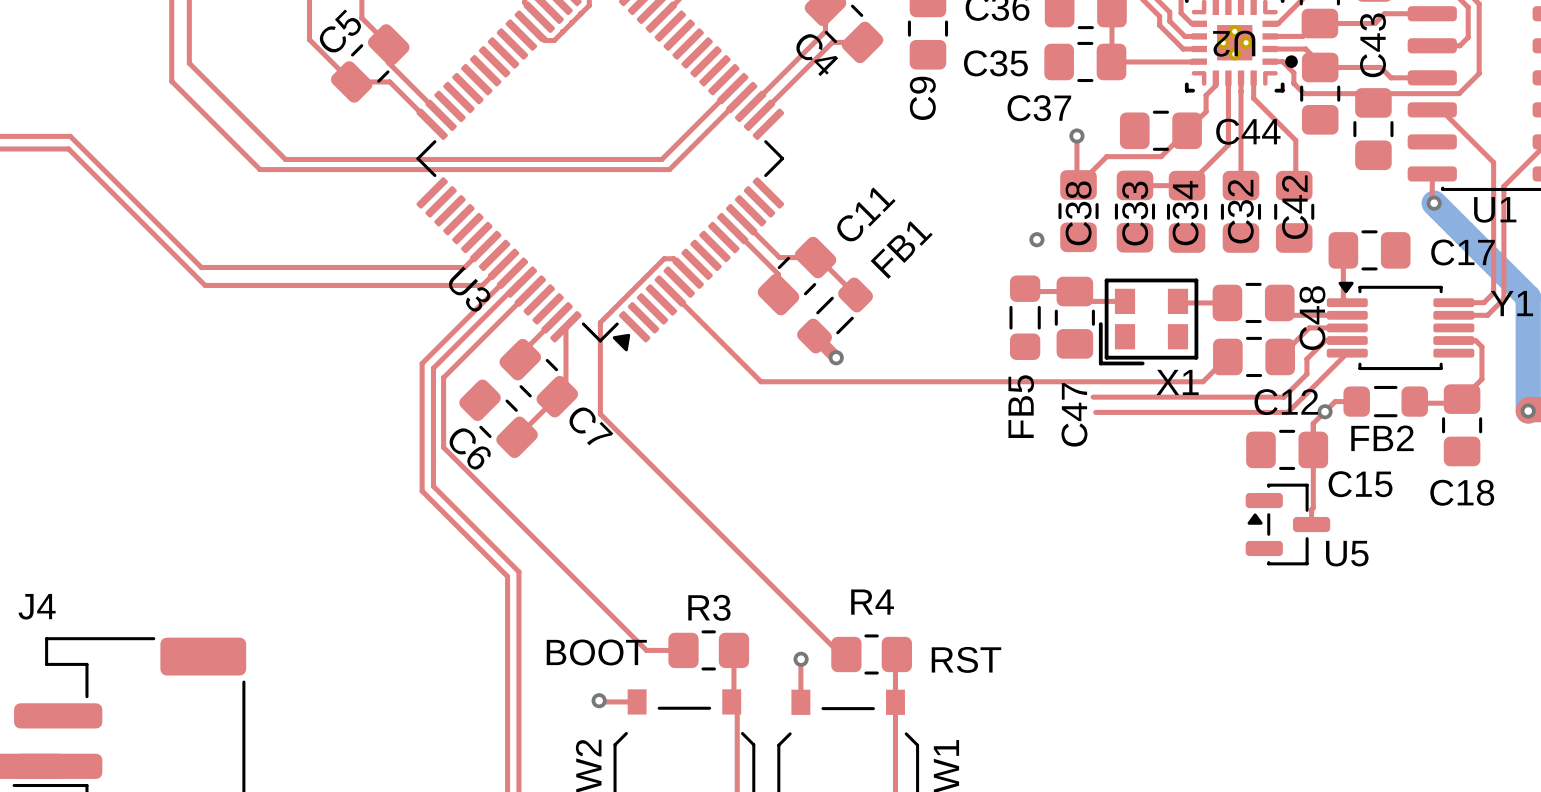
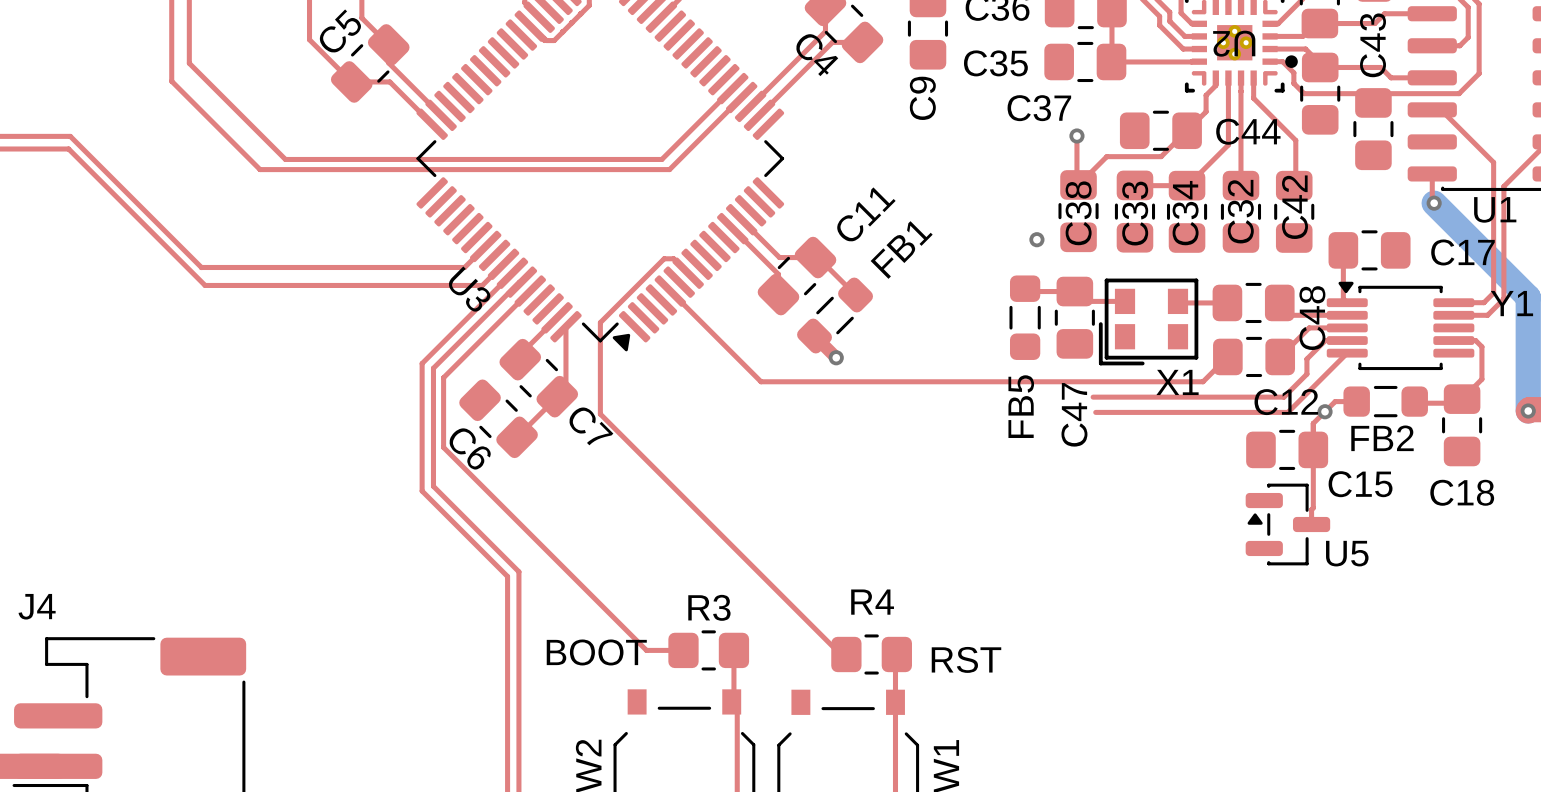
top track: (800, 659) (800, 702) -> none
via: (801, 659) -> none
top track: (599, 700) (637, 701) -> none
via: (599, 700) -> none

